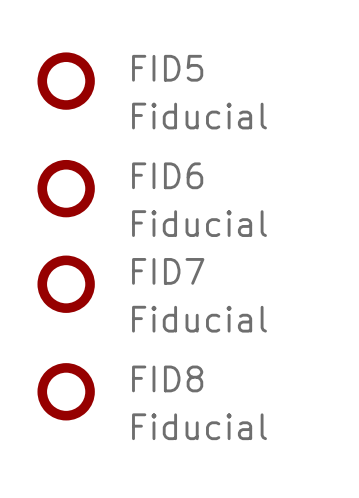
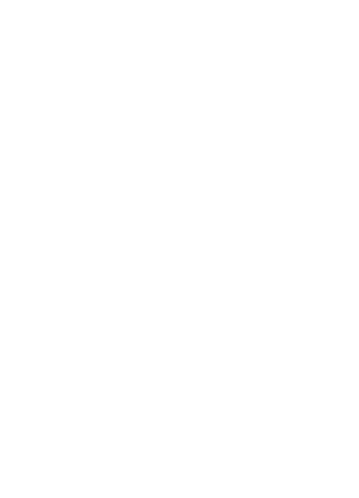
FID5: Fiducial (66, 81) -> none
FID6: Fiducial (66, 188) -> none
FID7: Fiducial (66, 284) -> none
FID8: Fiducial (66, 391) -> none

